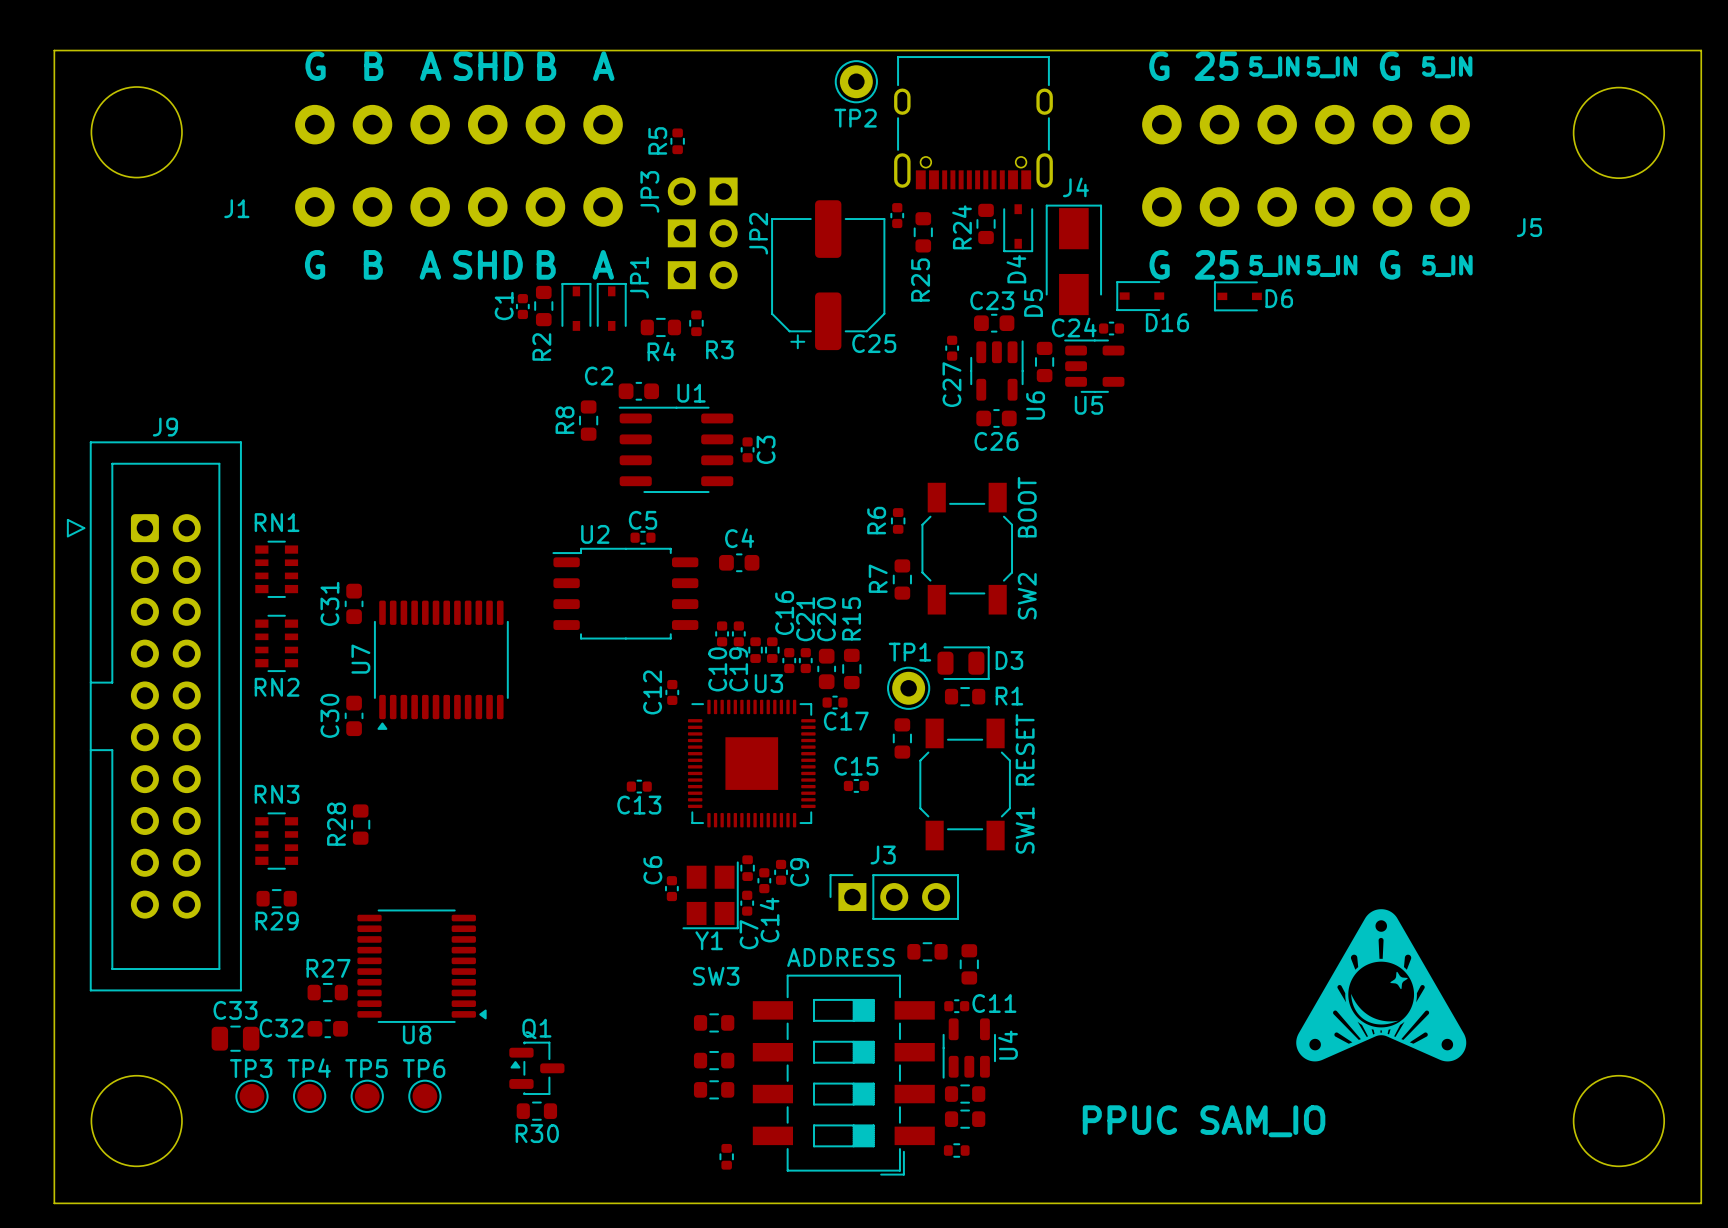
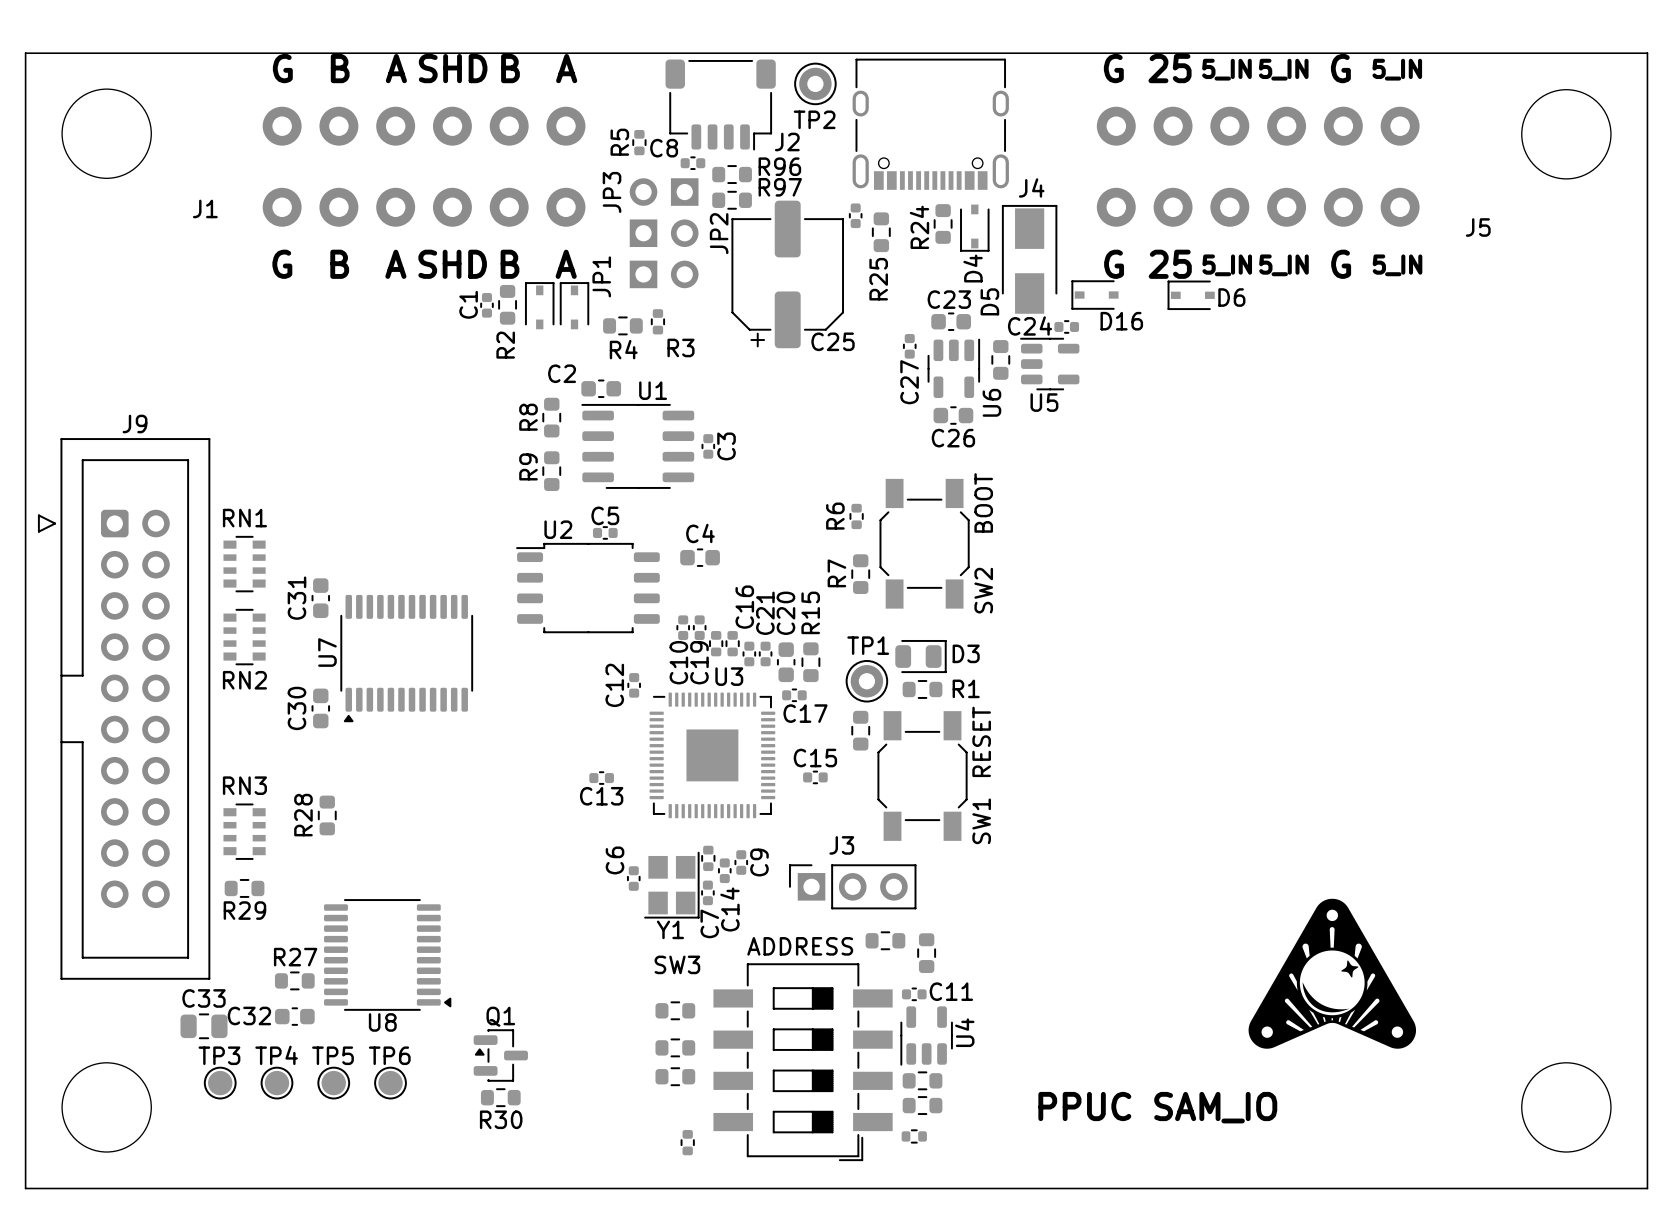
J2: none -> (720, 105)
C8: none -> (692, 163)
R96: none -> (732, 174)
R97: none -> (732, 200)
R9: none -> (551, 471)

